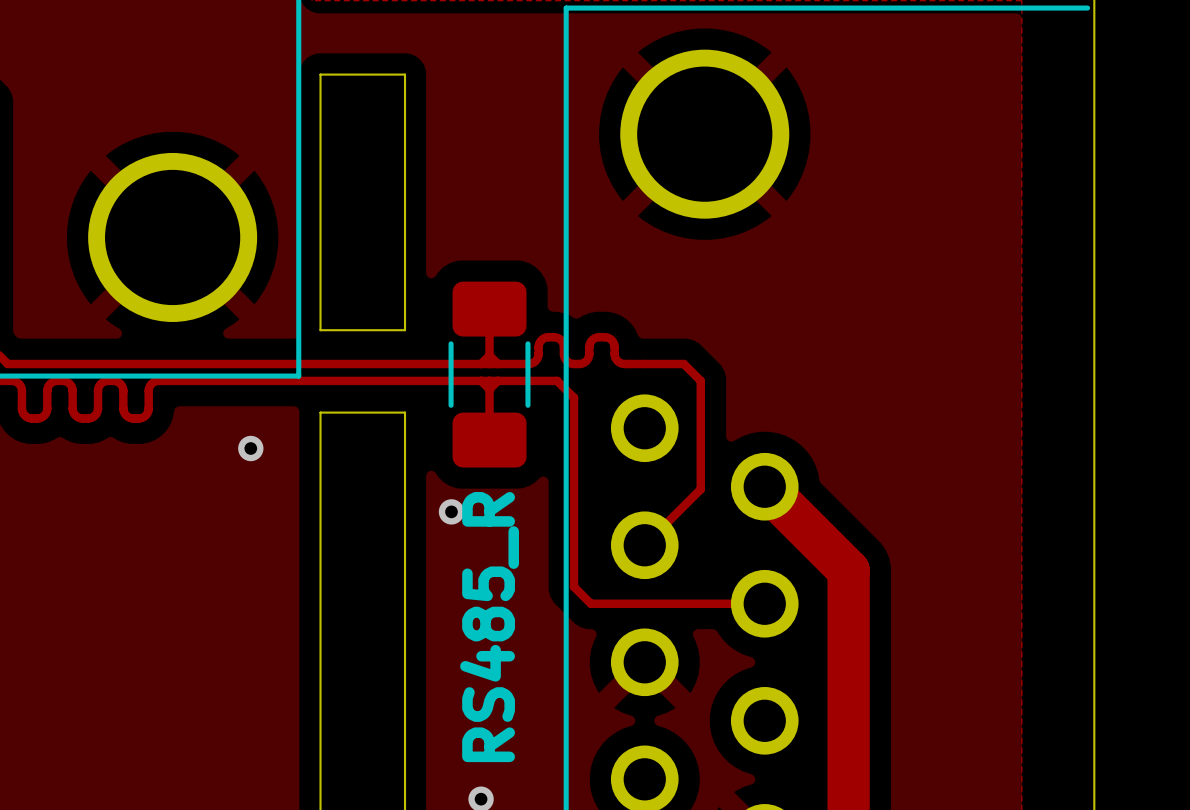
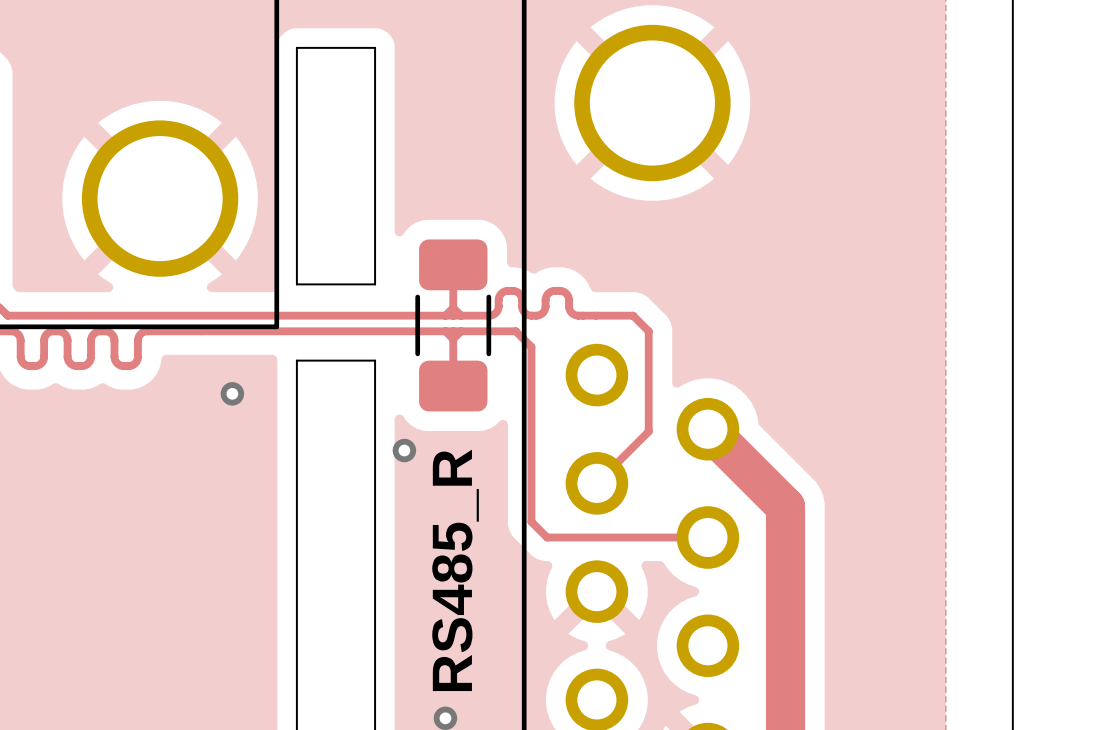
via position: (451, 511) -> (404, 450)

